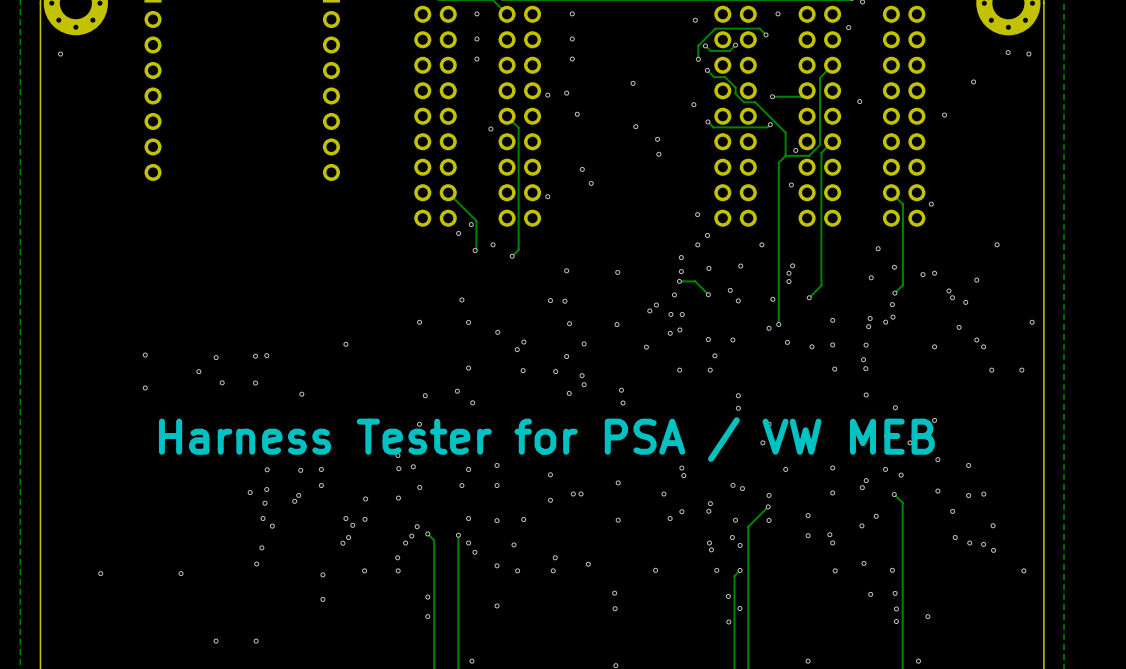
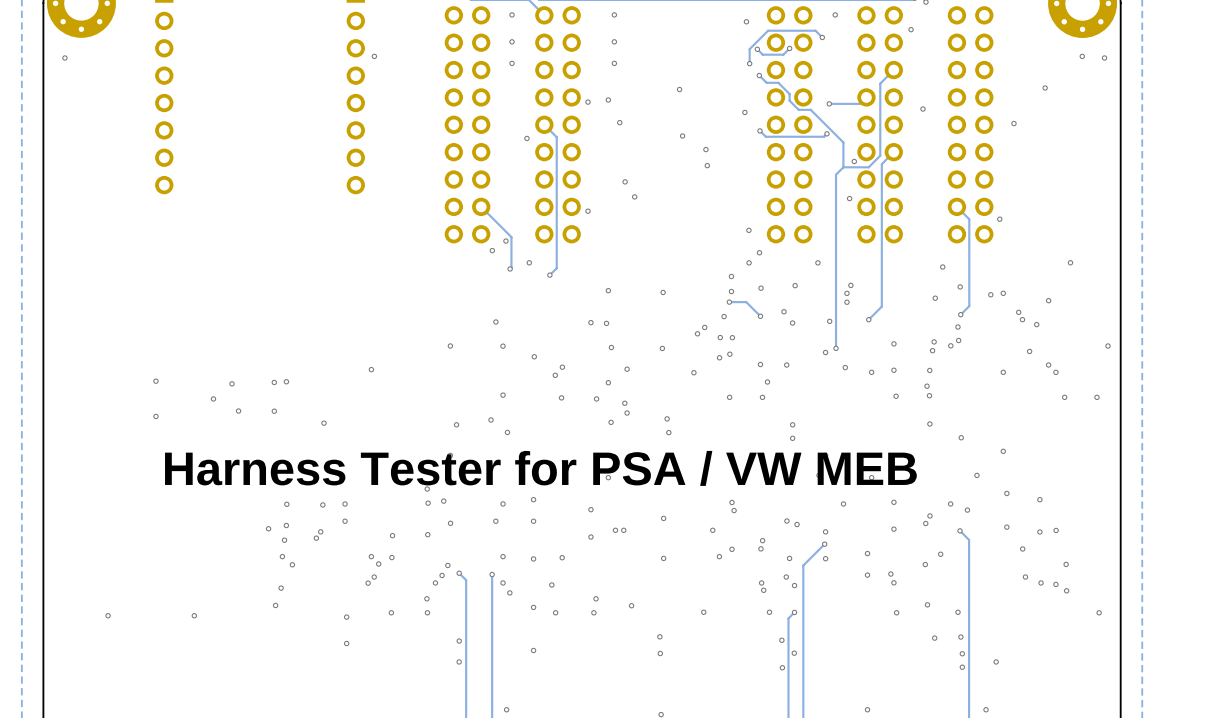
via: none -> (374, 56)
via: (216, 641) -> none
via: (256, 641) -> none

